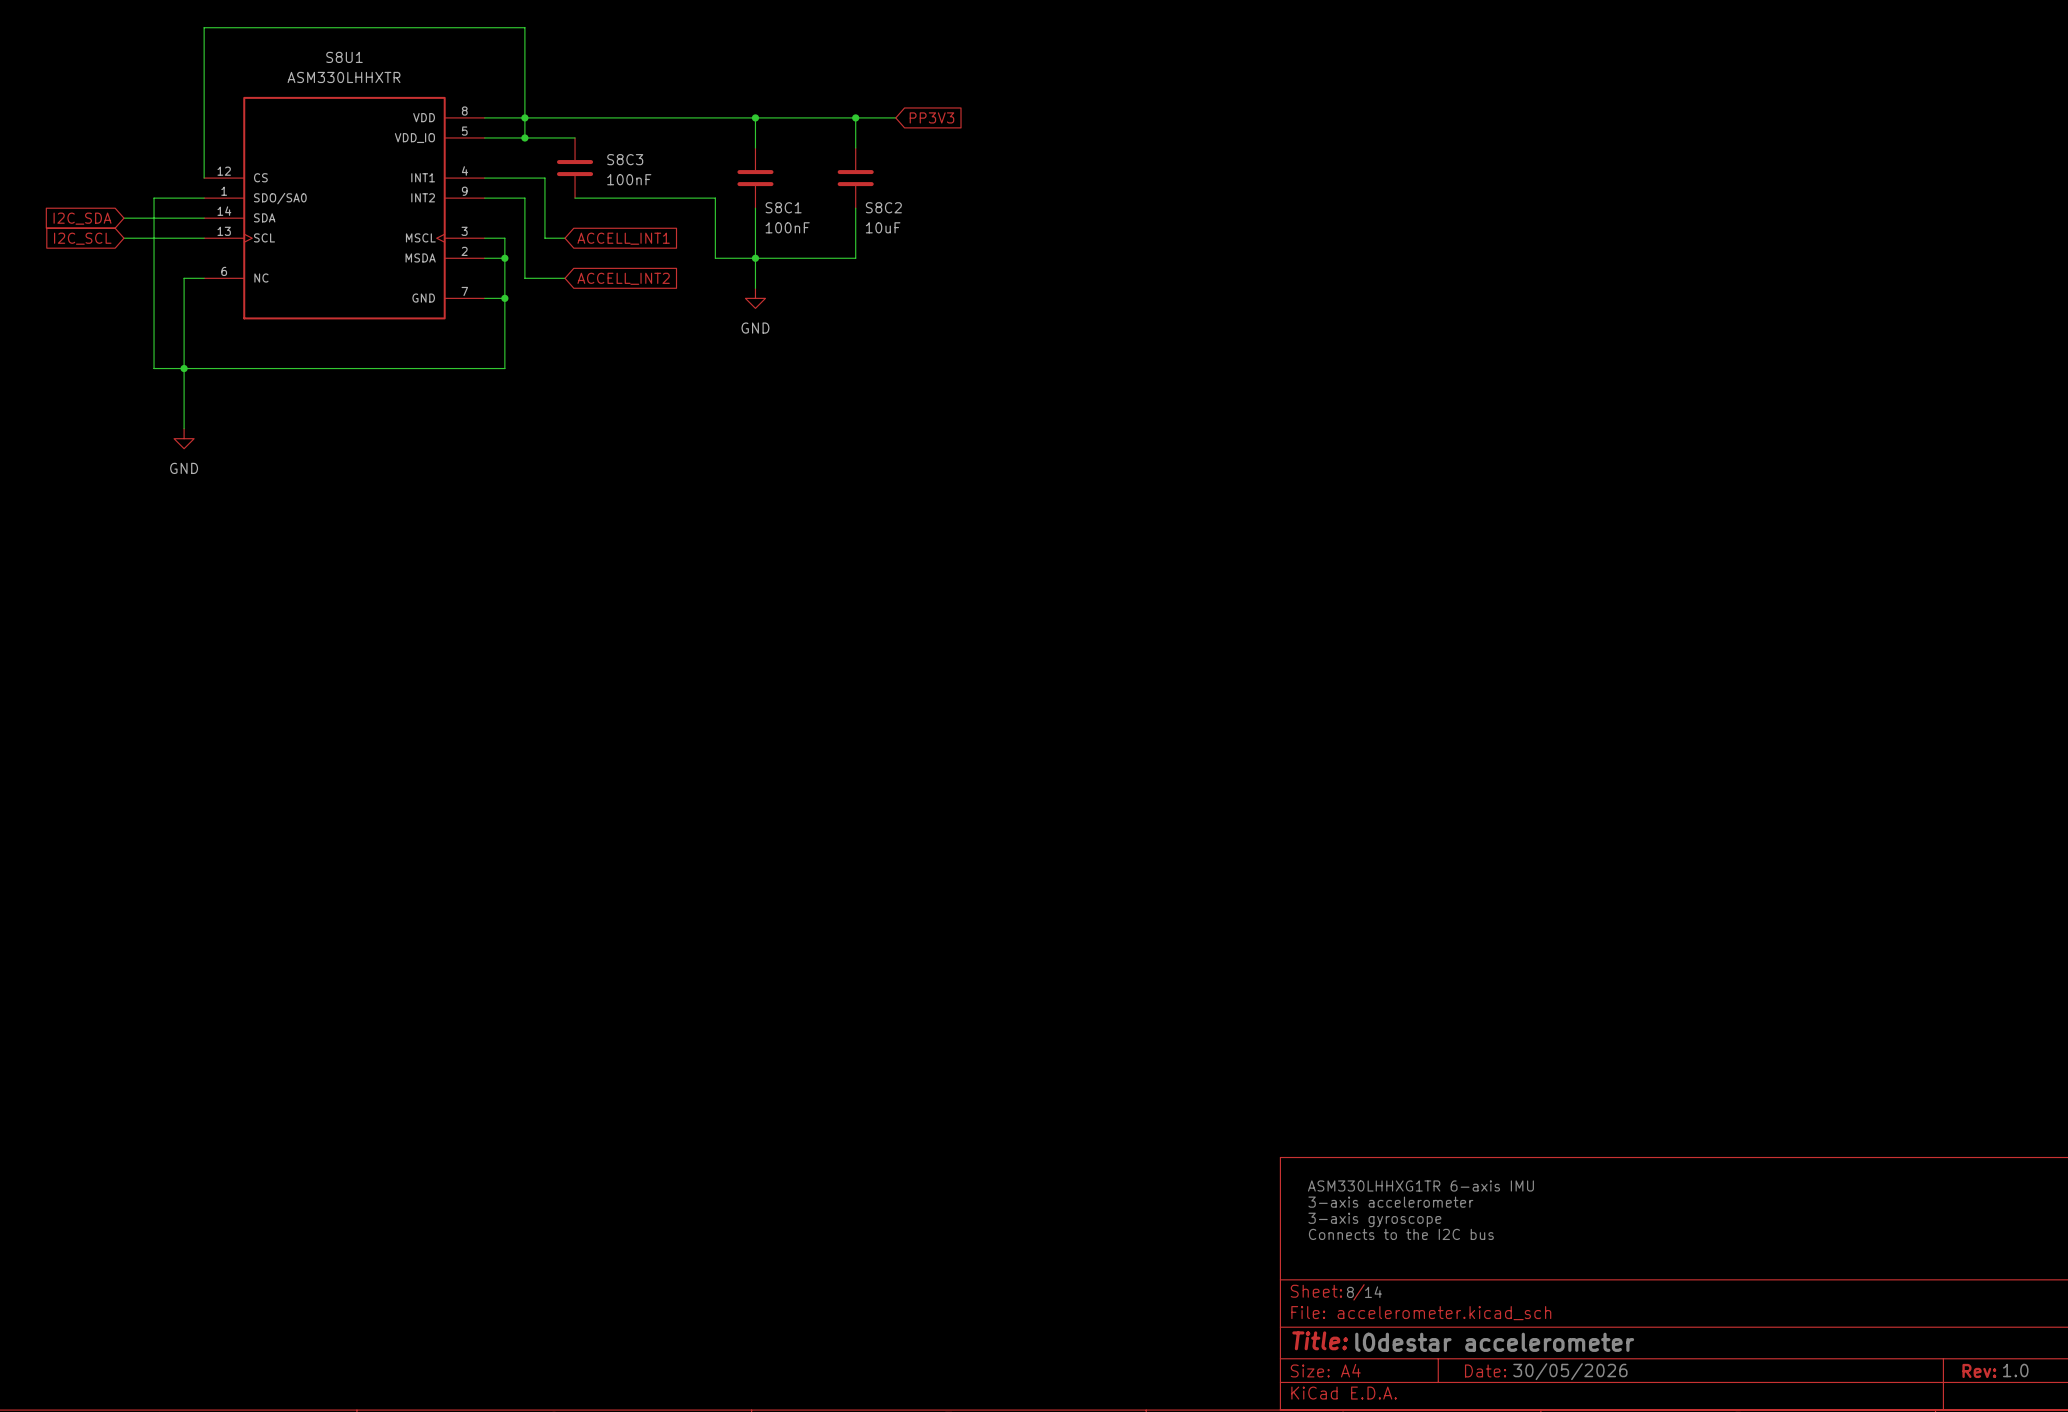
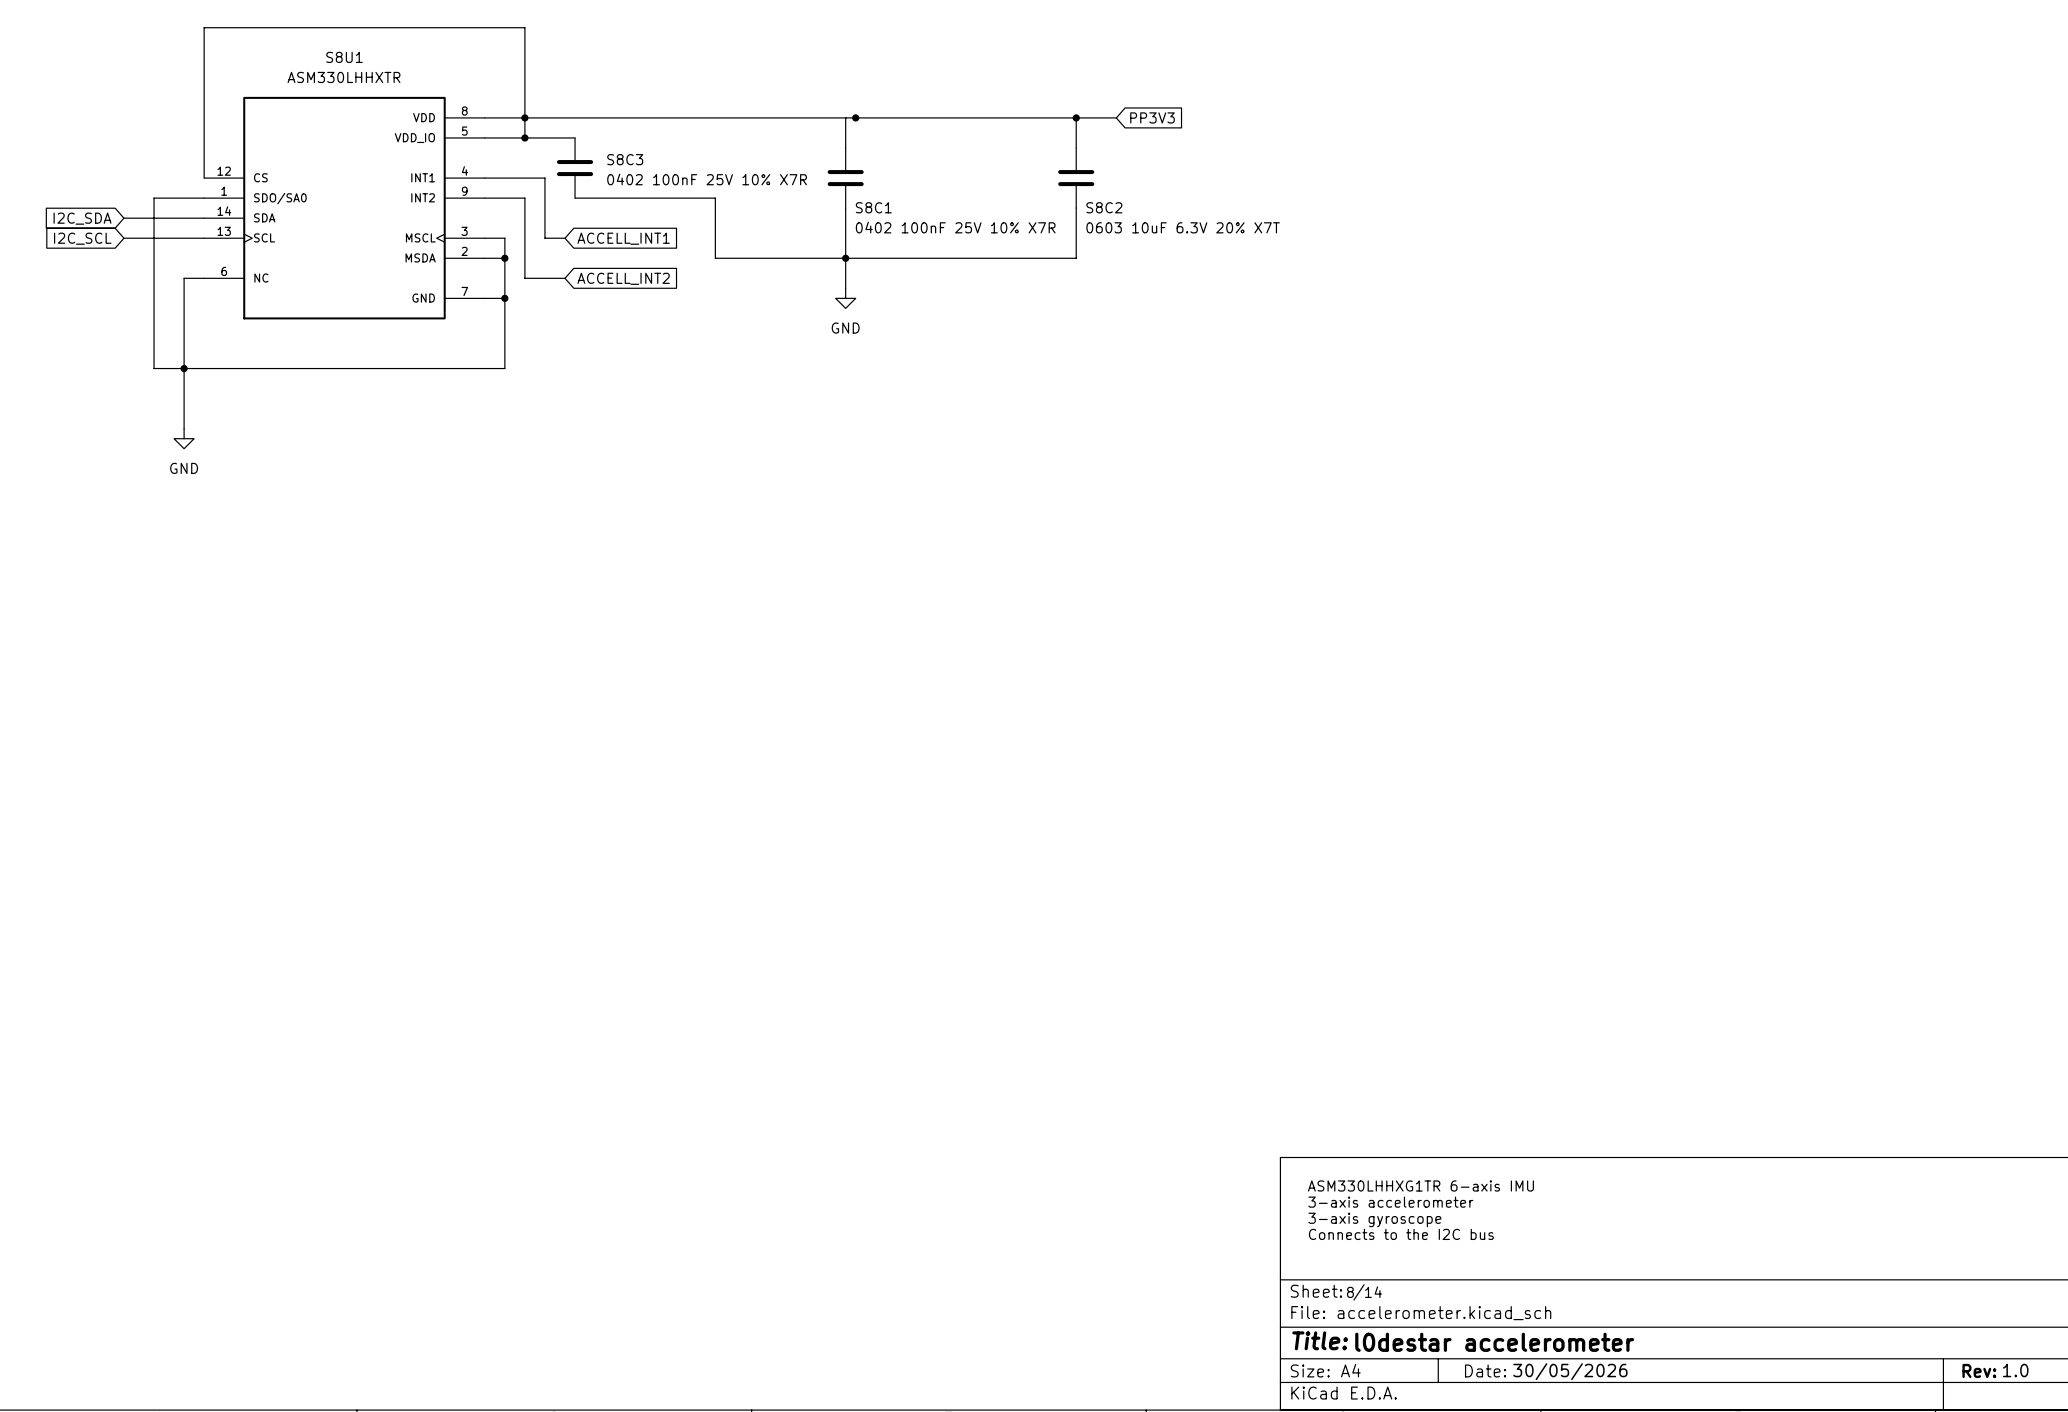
wire: (755, 117) (755, 148) -> (845, 117) (845, 148)
junction: (755, 117) -> none
wire: (855, 117) (855, 148) -> none
wire: none -> (895, 117) (1116, 117)
global label: PP3V3 (931, 117) -> none
wire: none -> (1076, 117) (1076, 148)
junction: none -> (1076, 117)
global label: none -> PP3V3 (1152, 117)
S8C1 position: (755, 178) -> (845, 178)
S8C2 position: (855, 178) -> (1076, 178)
S8C3 value: 100nF (629, 179) -> 0402 100nF 25V 10% X7R (707, 179)
wire: (755, 208) (755, 288) -> (845, 208) (845, 288)
wire: (855, 208) (855, 258) -> (1076, 208) (1076, 258) (855, 258)
S8C1 value: 100nF (787, 227) -> 0402 100nF 25V 10% X7R (955, 227)
S8C2 value: 10uF (883, 227) -> 0603 10uF 6.3V 20% X7T (1183, 227)
junction: (755, 258) -> none
junction: none -> (845, 258)
power symbol position: GND (755, 298) -> GND (845, 298)

